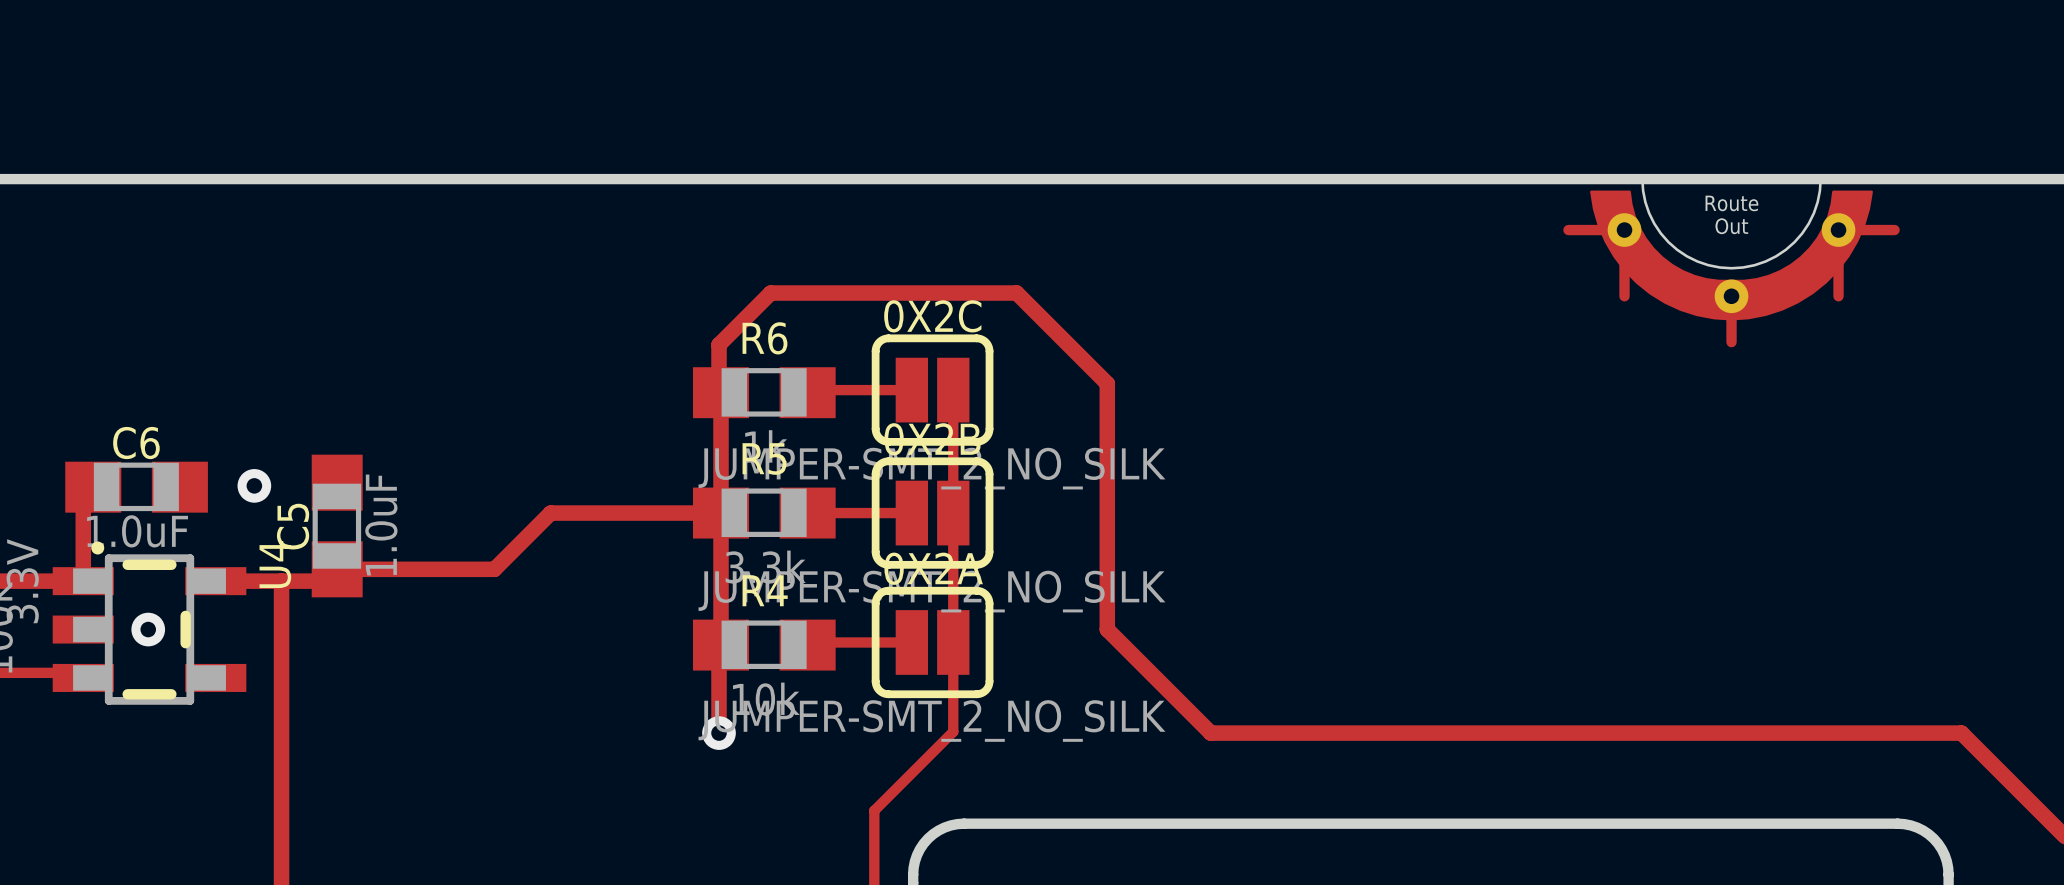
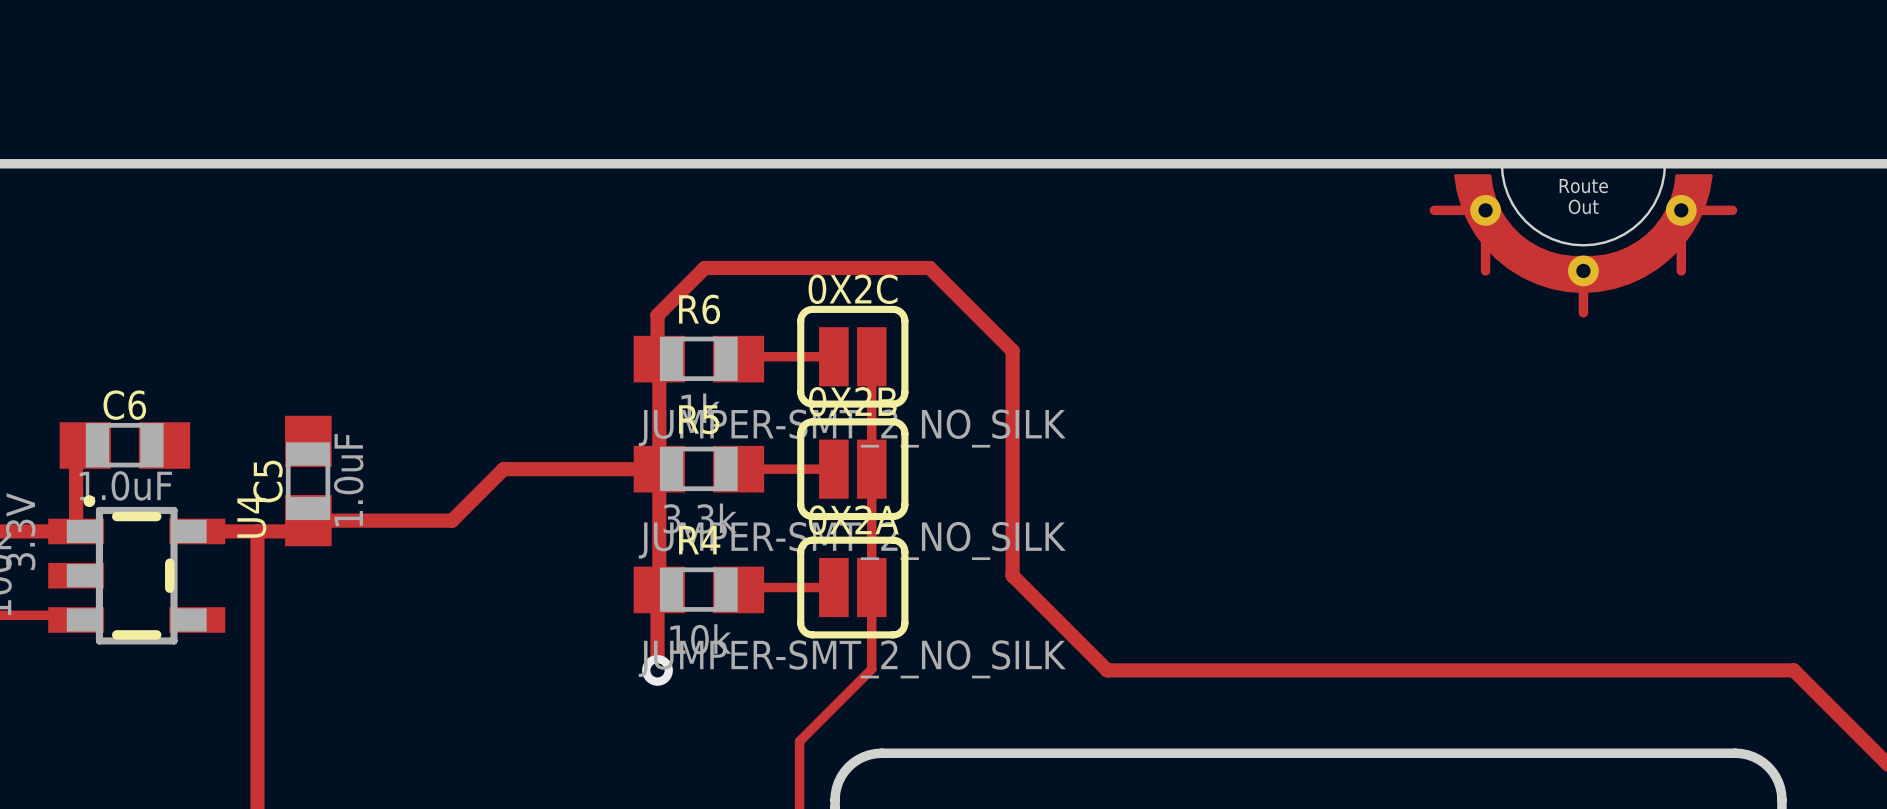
via: (254, 485) -> none
via: (148, 629) -> none

